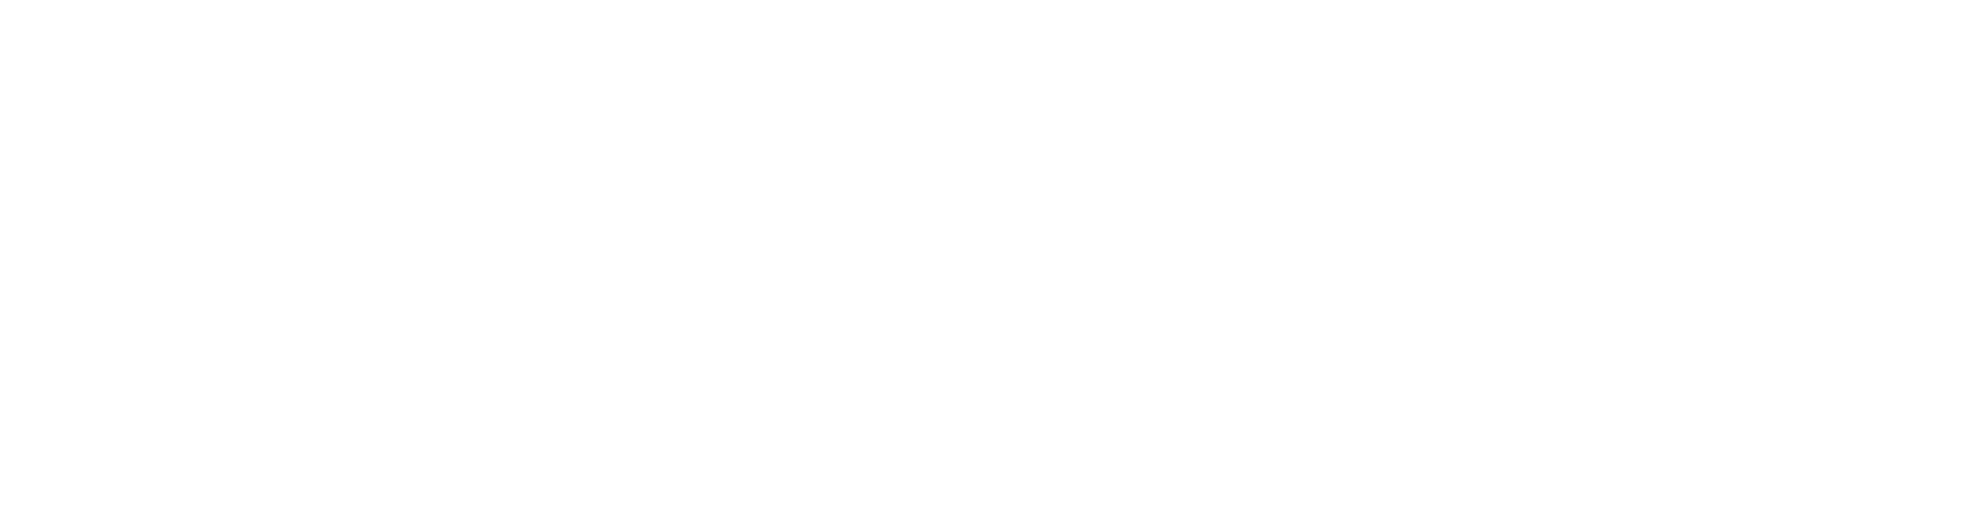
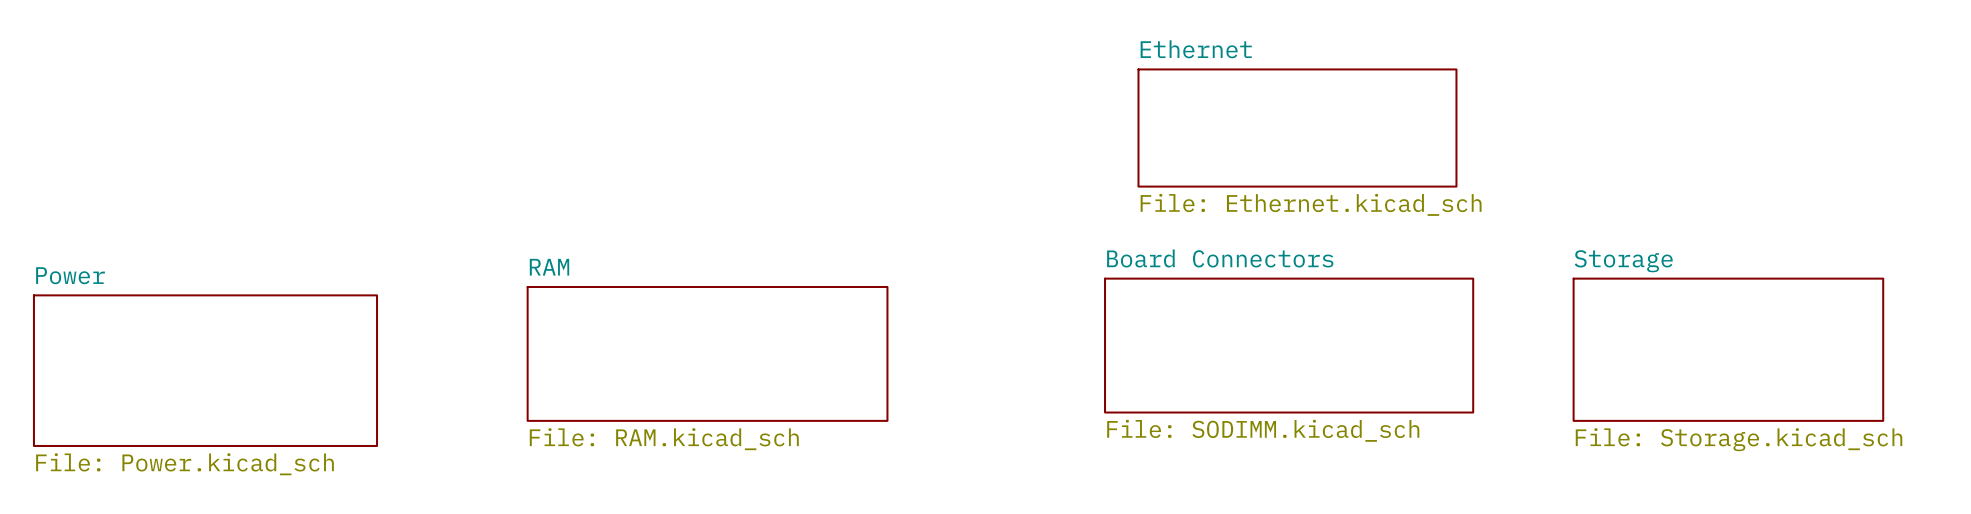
sheet Ethernet: none -> File: Ethernet.kicad_sch (1297, 128)
sheet Board Connectors: none -> File: SODIMM.kicad_sch (1289, 345)
sheet Storage: none -> File: Storage.kicad_sch (1728, 349)
sheet RAM: none -> File: RAM.kicad_sch (707, 353)
sheet Power: none -> File: Power.kicad_sch (205, 370)

